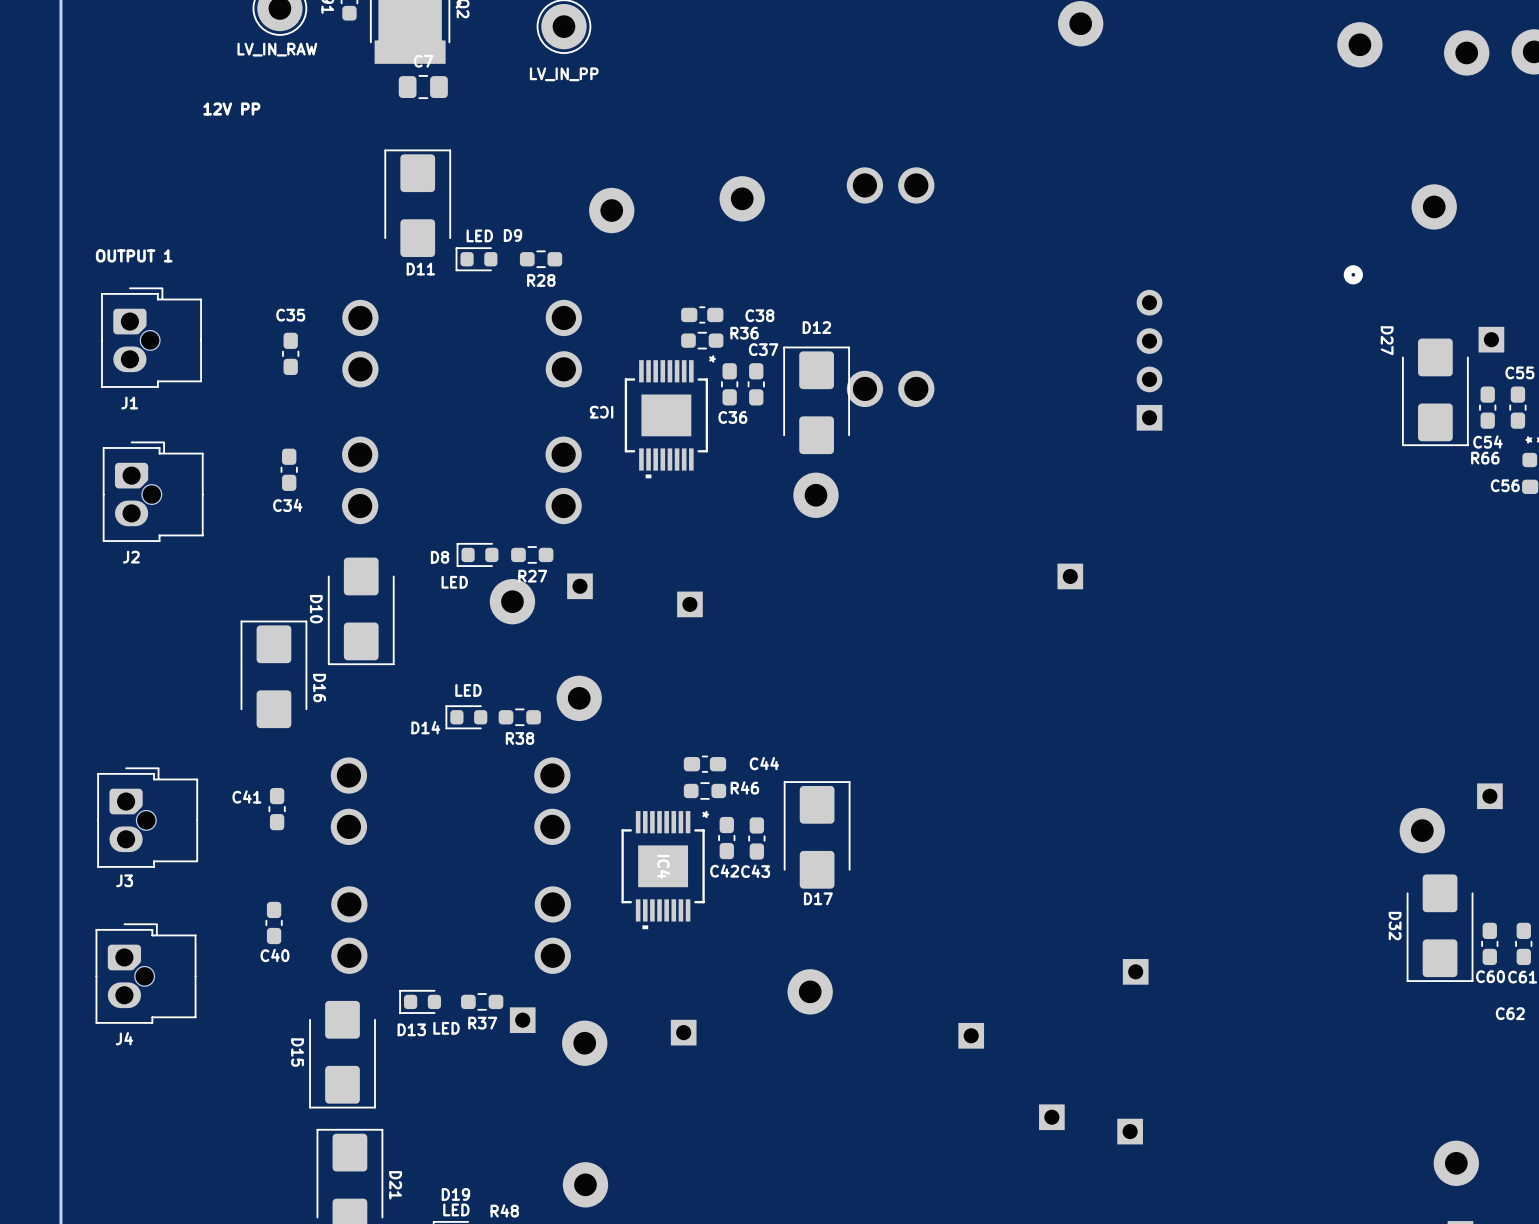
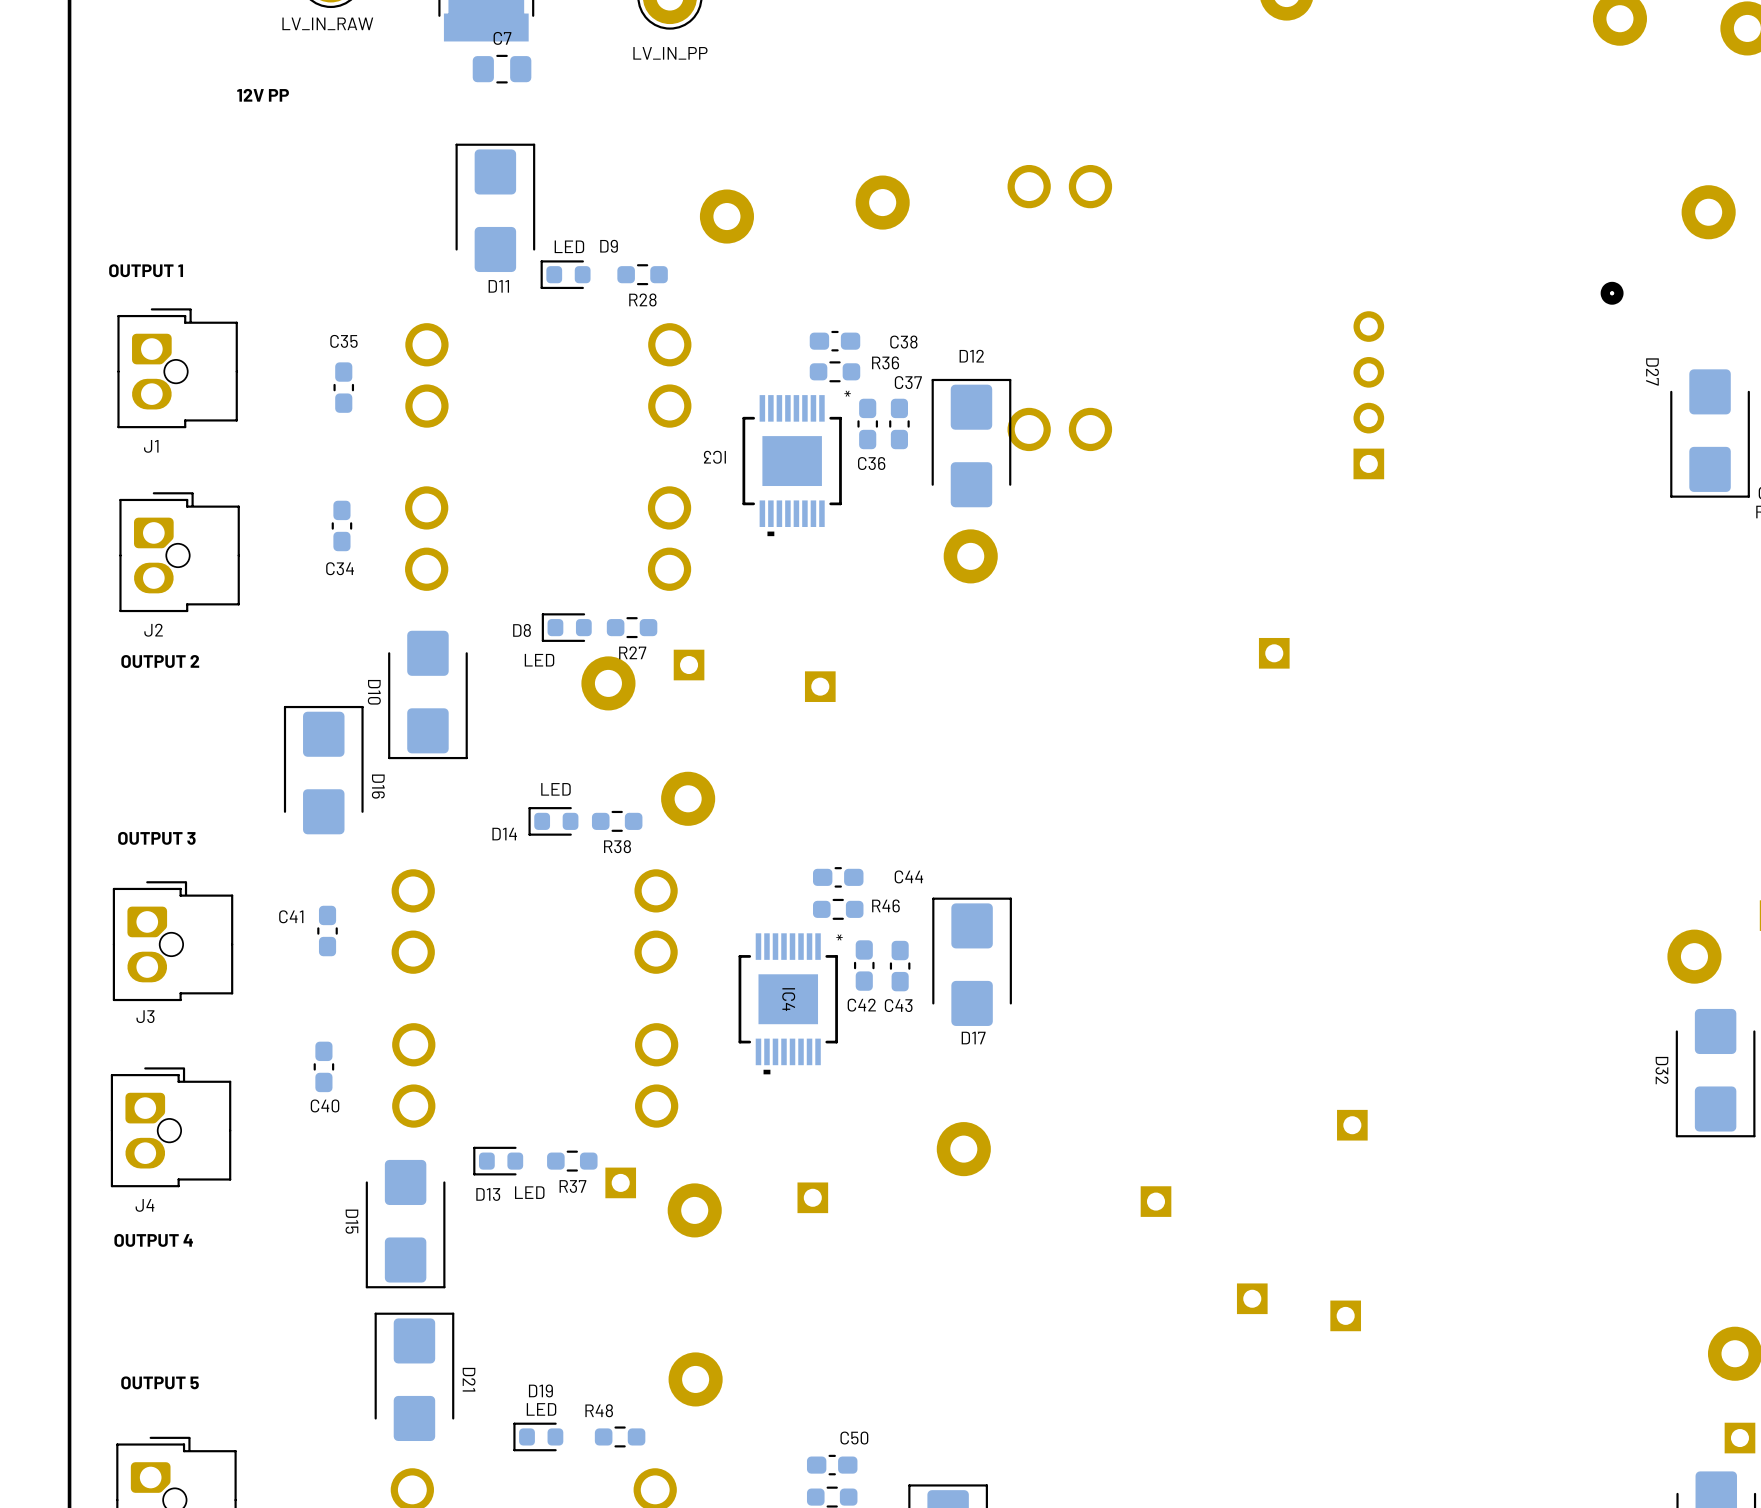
text: none -> OUTPUT 2 (160, 661)
text: none -> OUTPUT 3 (156, 838)
text: none -> OUTPUT 4 (153, 1240)
text: none -> OUTPUT 5 (160, 1382)

